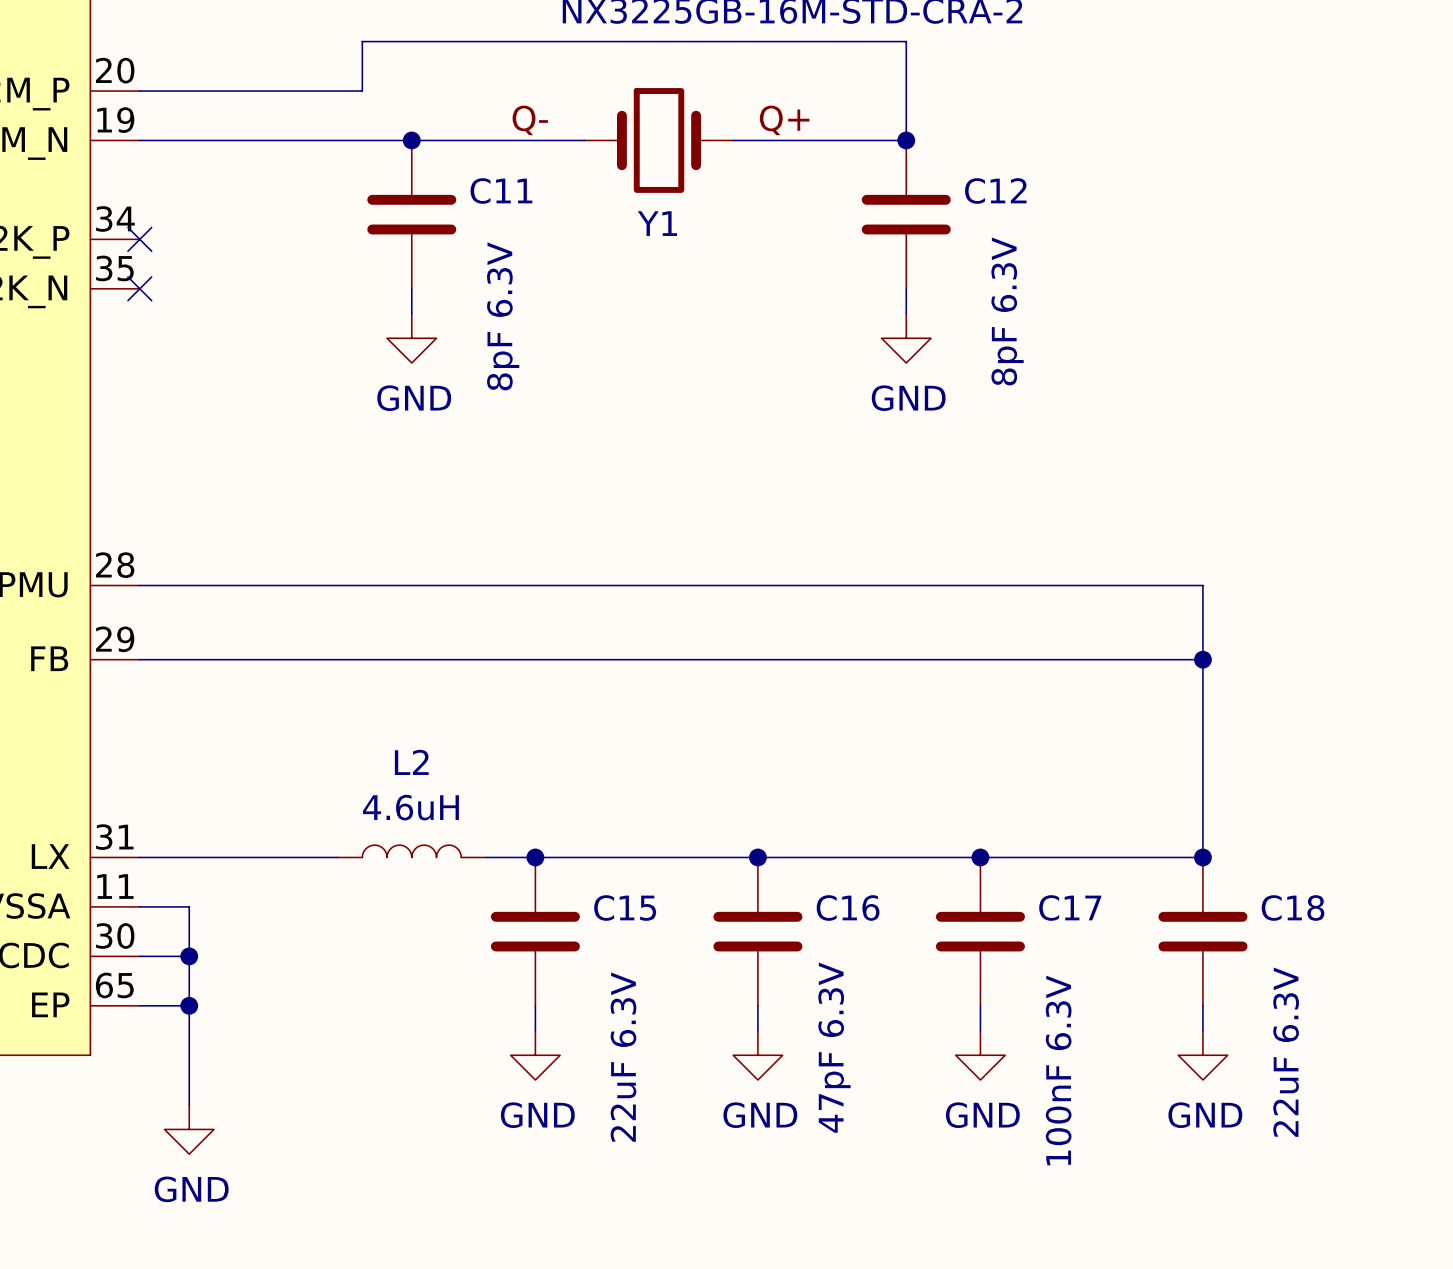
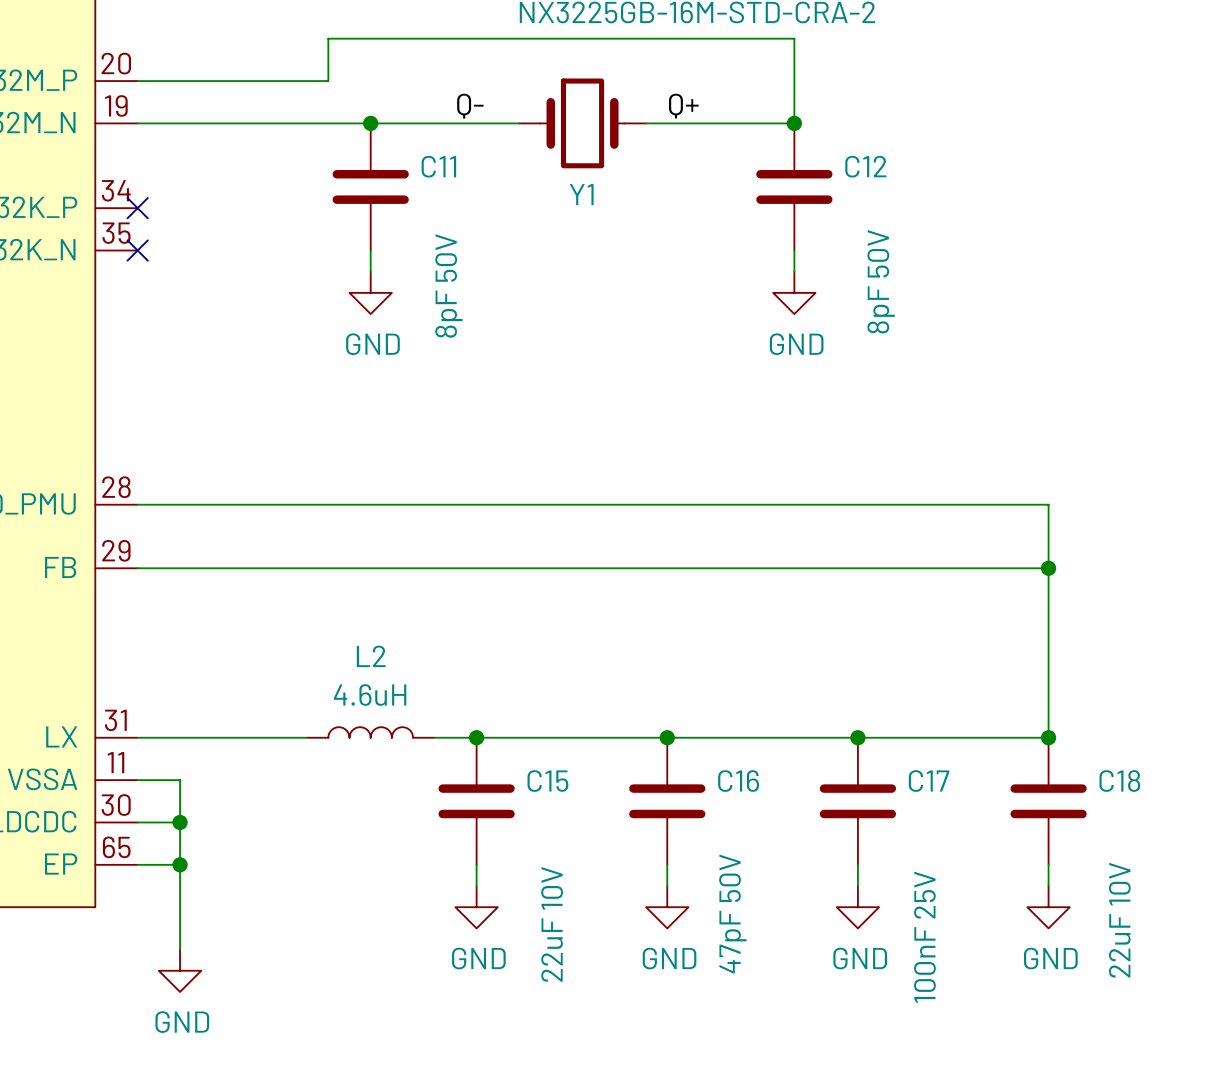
C12 value: 8pF 6.3V (1007, 311) -> 8pF 50V (881, 281)
C11 value: 8pF 6.3V (503, 316) -> 8pF 50V (448, 286)
C16 value: 47pF 6.3V (834, 1047) -> 47pF 50V (732, 914)
C18 value: 22uF 6.3V (1286, 1052) -> 22uF 10V (1119, 920)
C15 value: 22uF 6.3V (623, 1057) -> 22uF 10V (552, 924)
C17 value: 100nF 6.3V (1058, 1070) -> 100nF 25V (924, 937)

